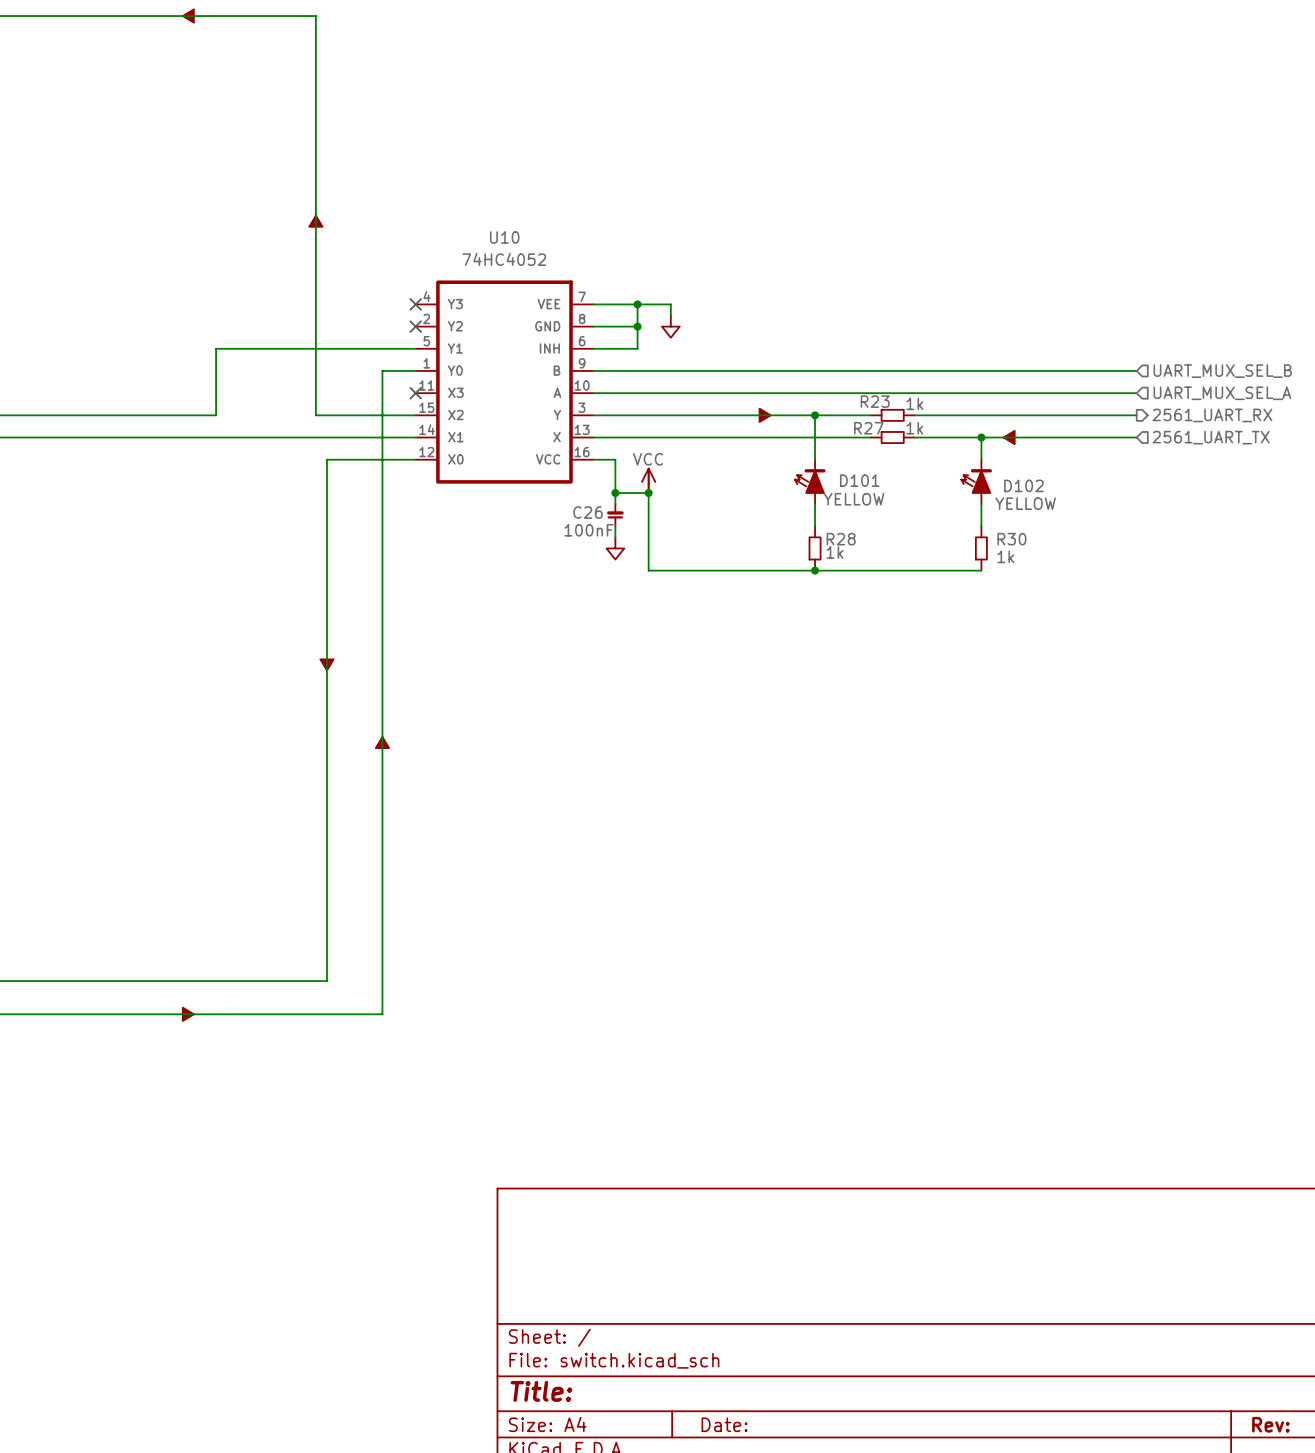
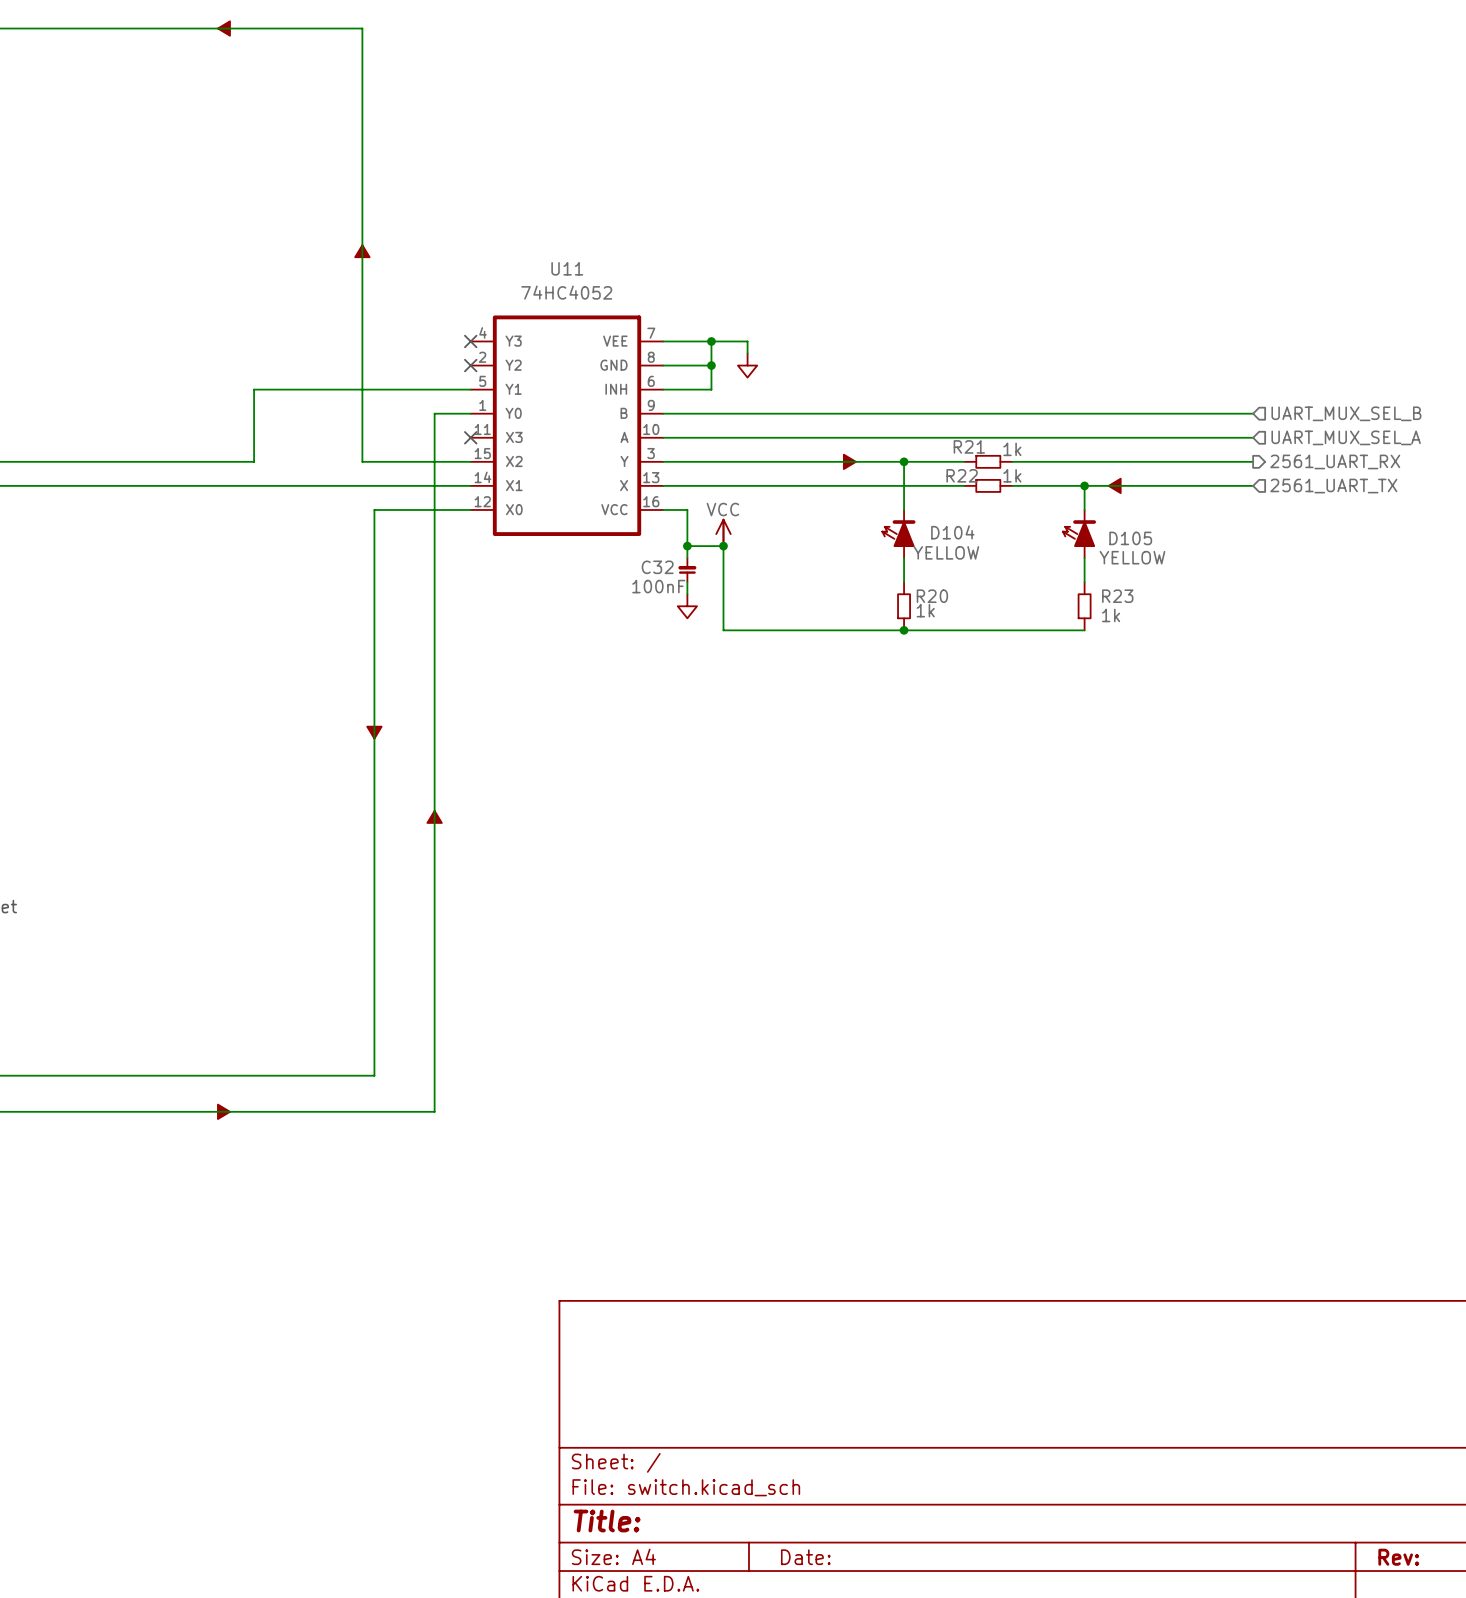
U10 name: U10 (504, 237) -> U11 (567, 268)
R23 name: R23 (875, 401) -> R21 (969, 446)
R27 name: R27 (868, 428) -> R22 (962, 475)
D101 name: D101 (859, 480) -> D104 (952, 532)
D102 name: D102 (1023, 485) -> D105 (1130, 538)
C26 name: C26 (588, 512) -> C32 (657, 567)
R28 name: R28 (841, 539) -> R20 (932, 596)
R30 name: R30 (1011, 539) -> R23 (1117, 596)

